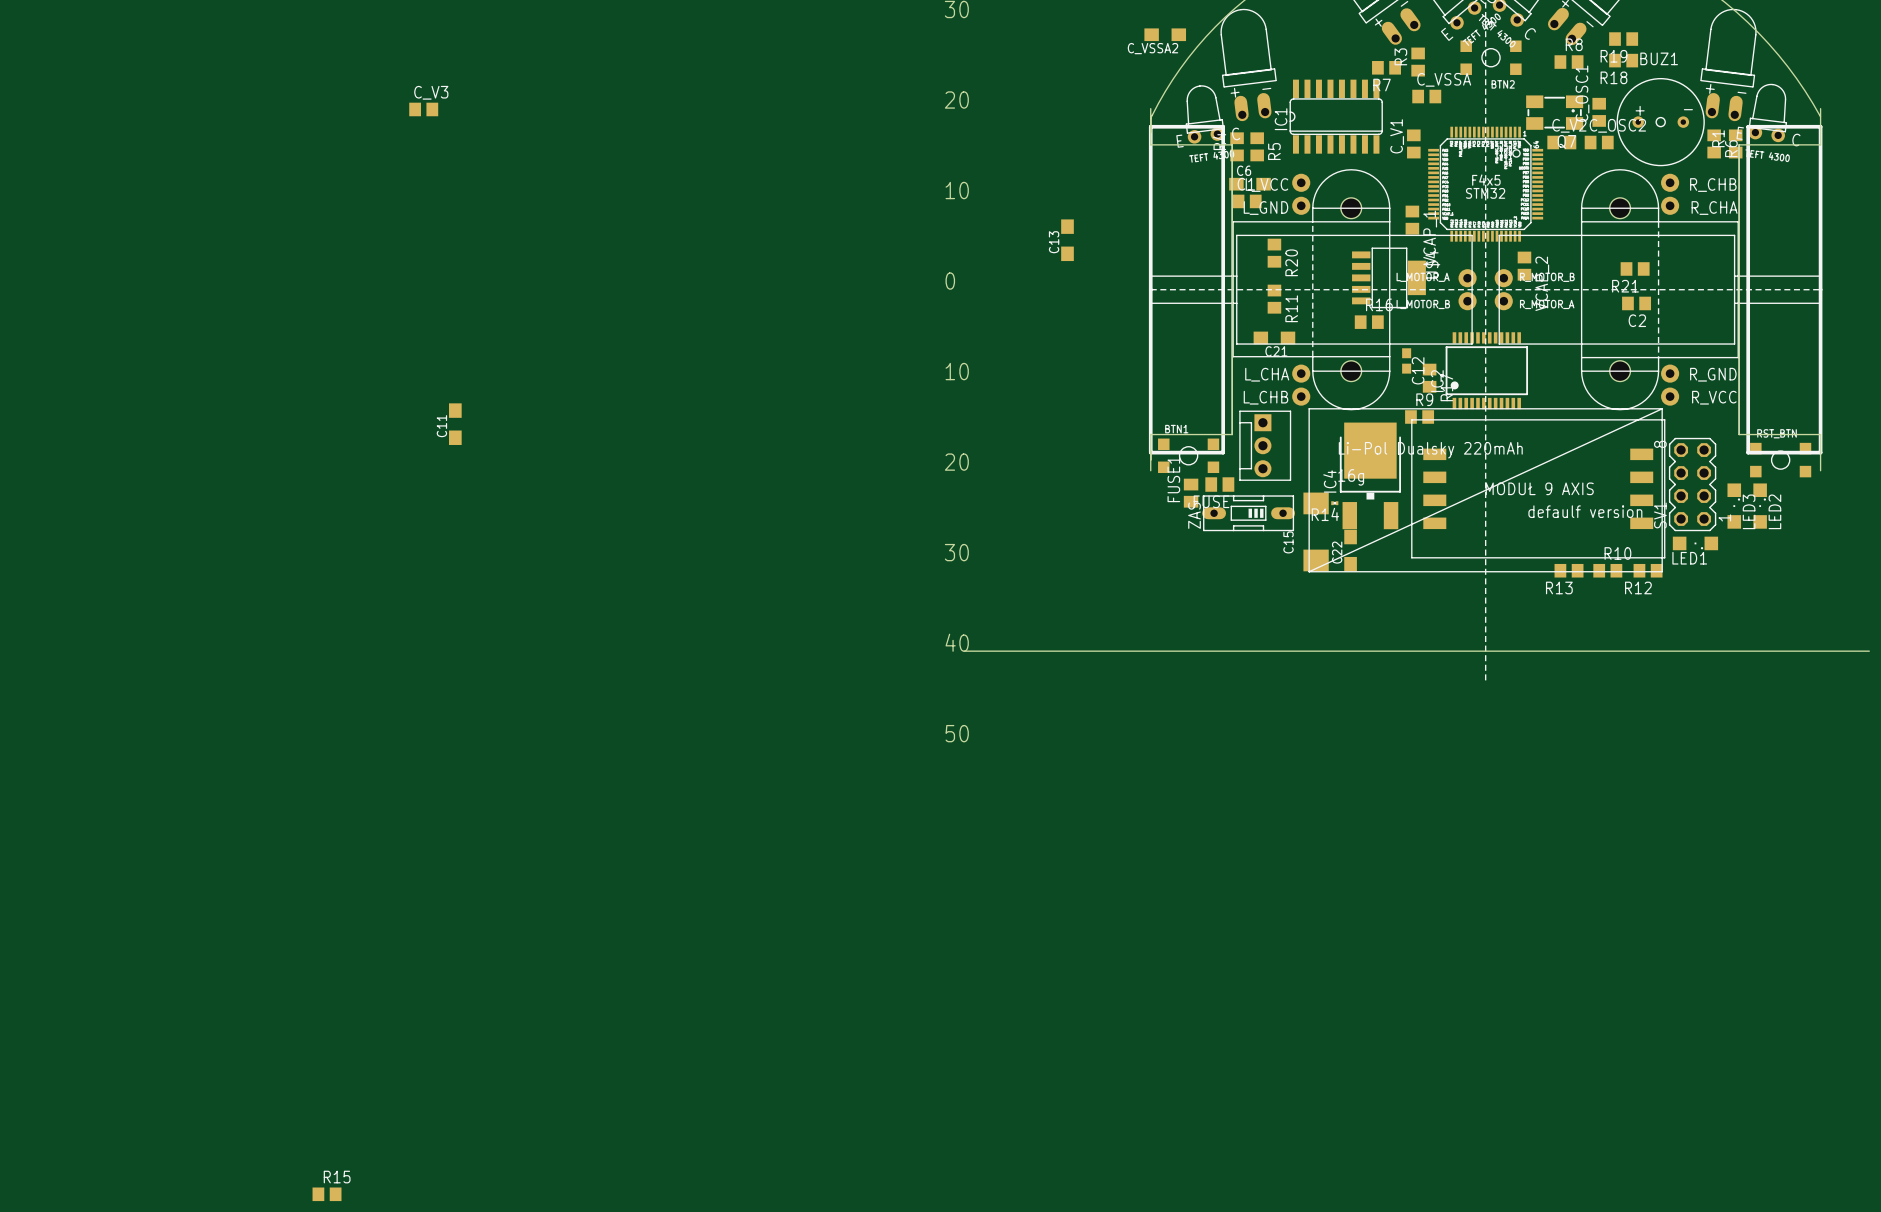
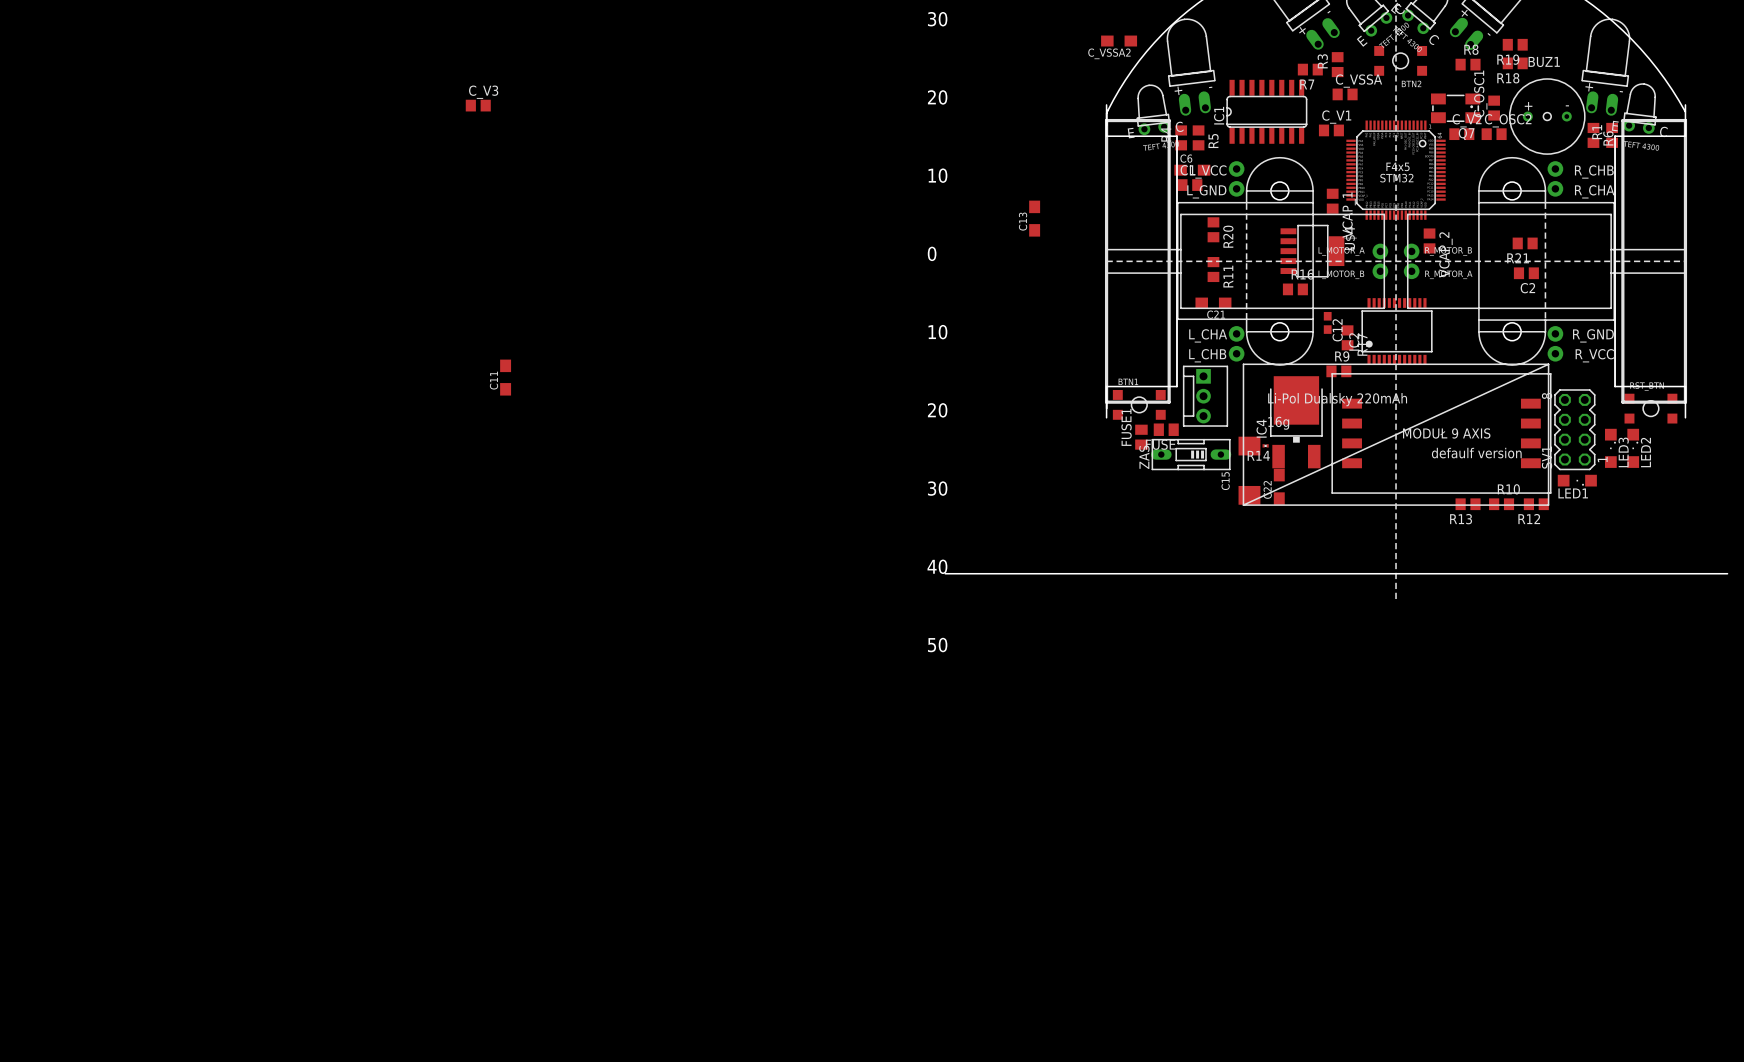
C_V1 rotation: 0° (1413, 143) -> 90° clockwise (1331, 130)
R15: (327, 1194) -> none

